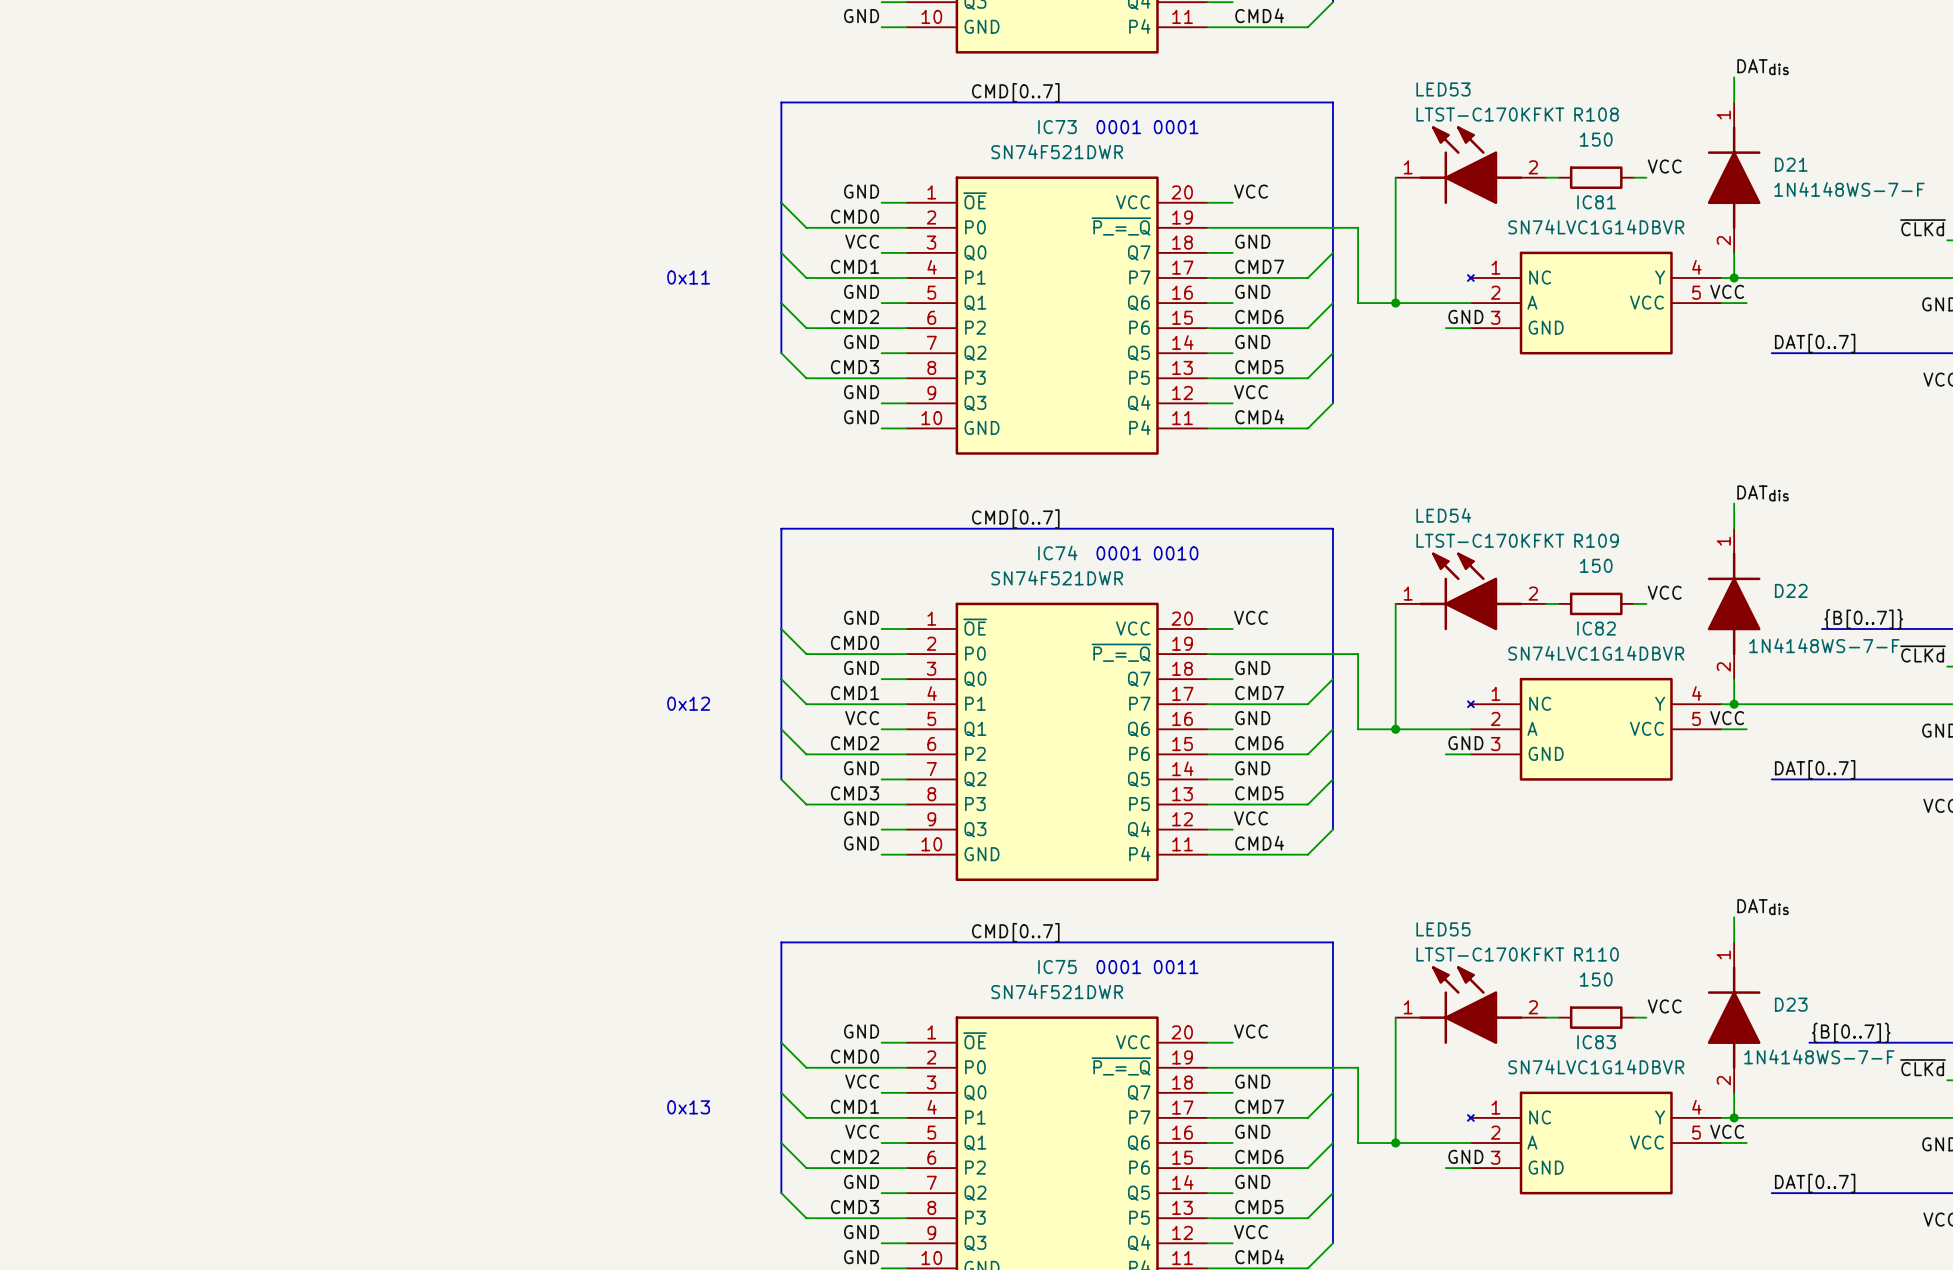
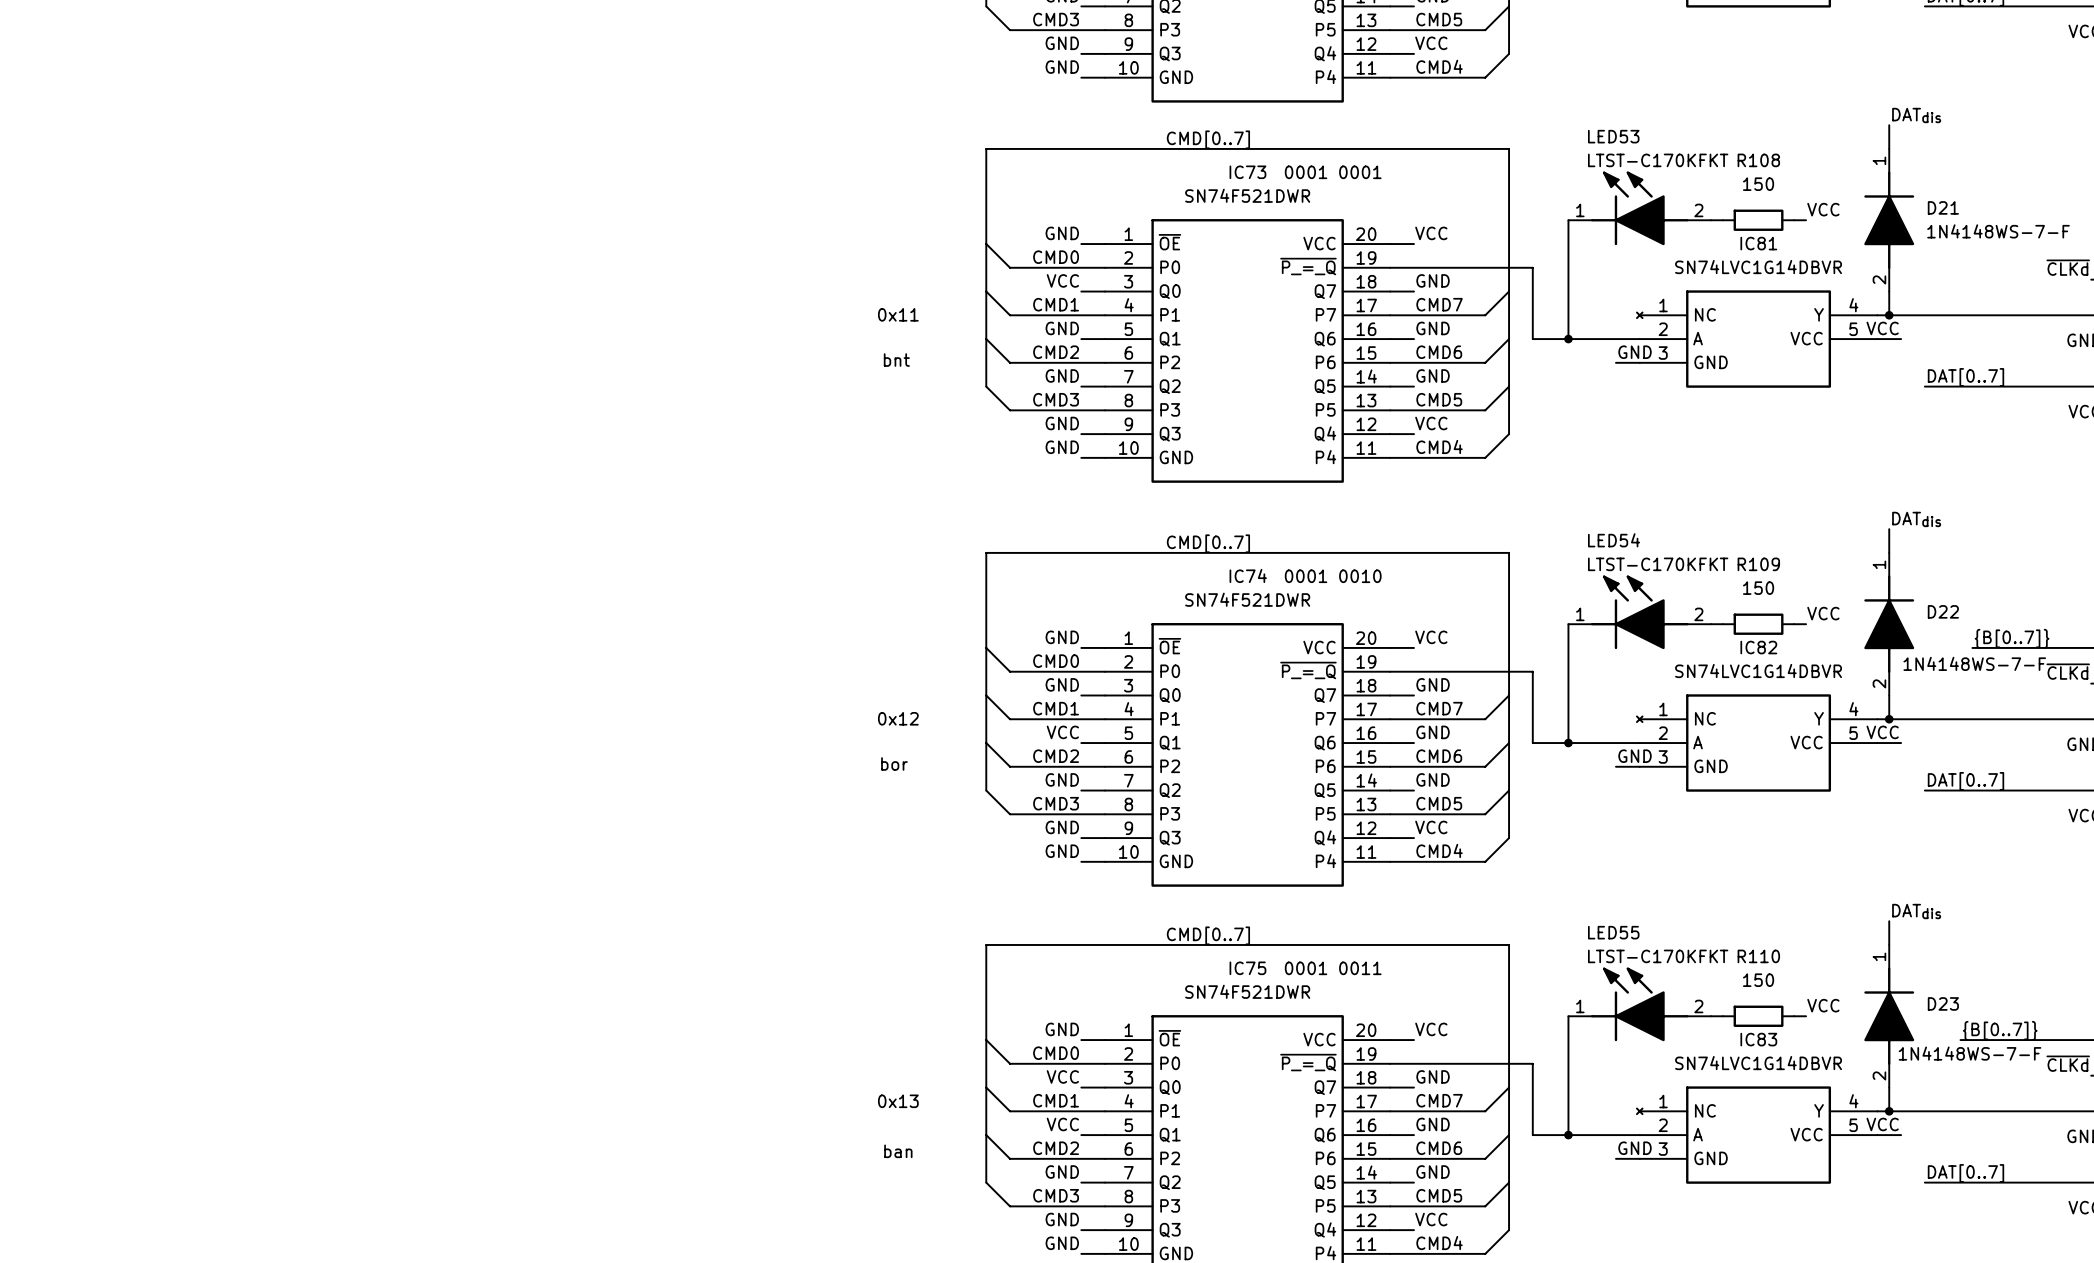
text: none -> bnt (896, 360)
text: none -> bor (894, 763)
text: none -> ban (898, 1151)

